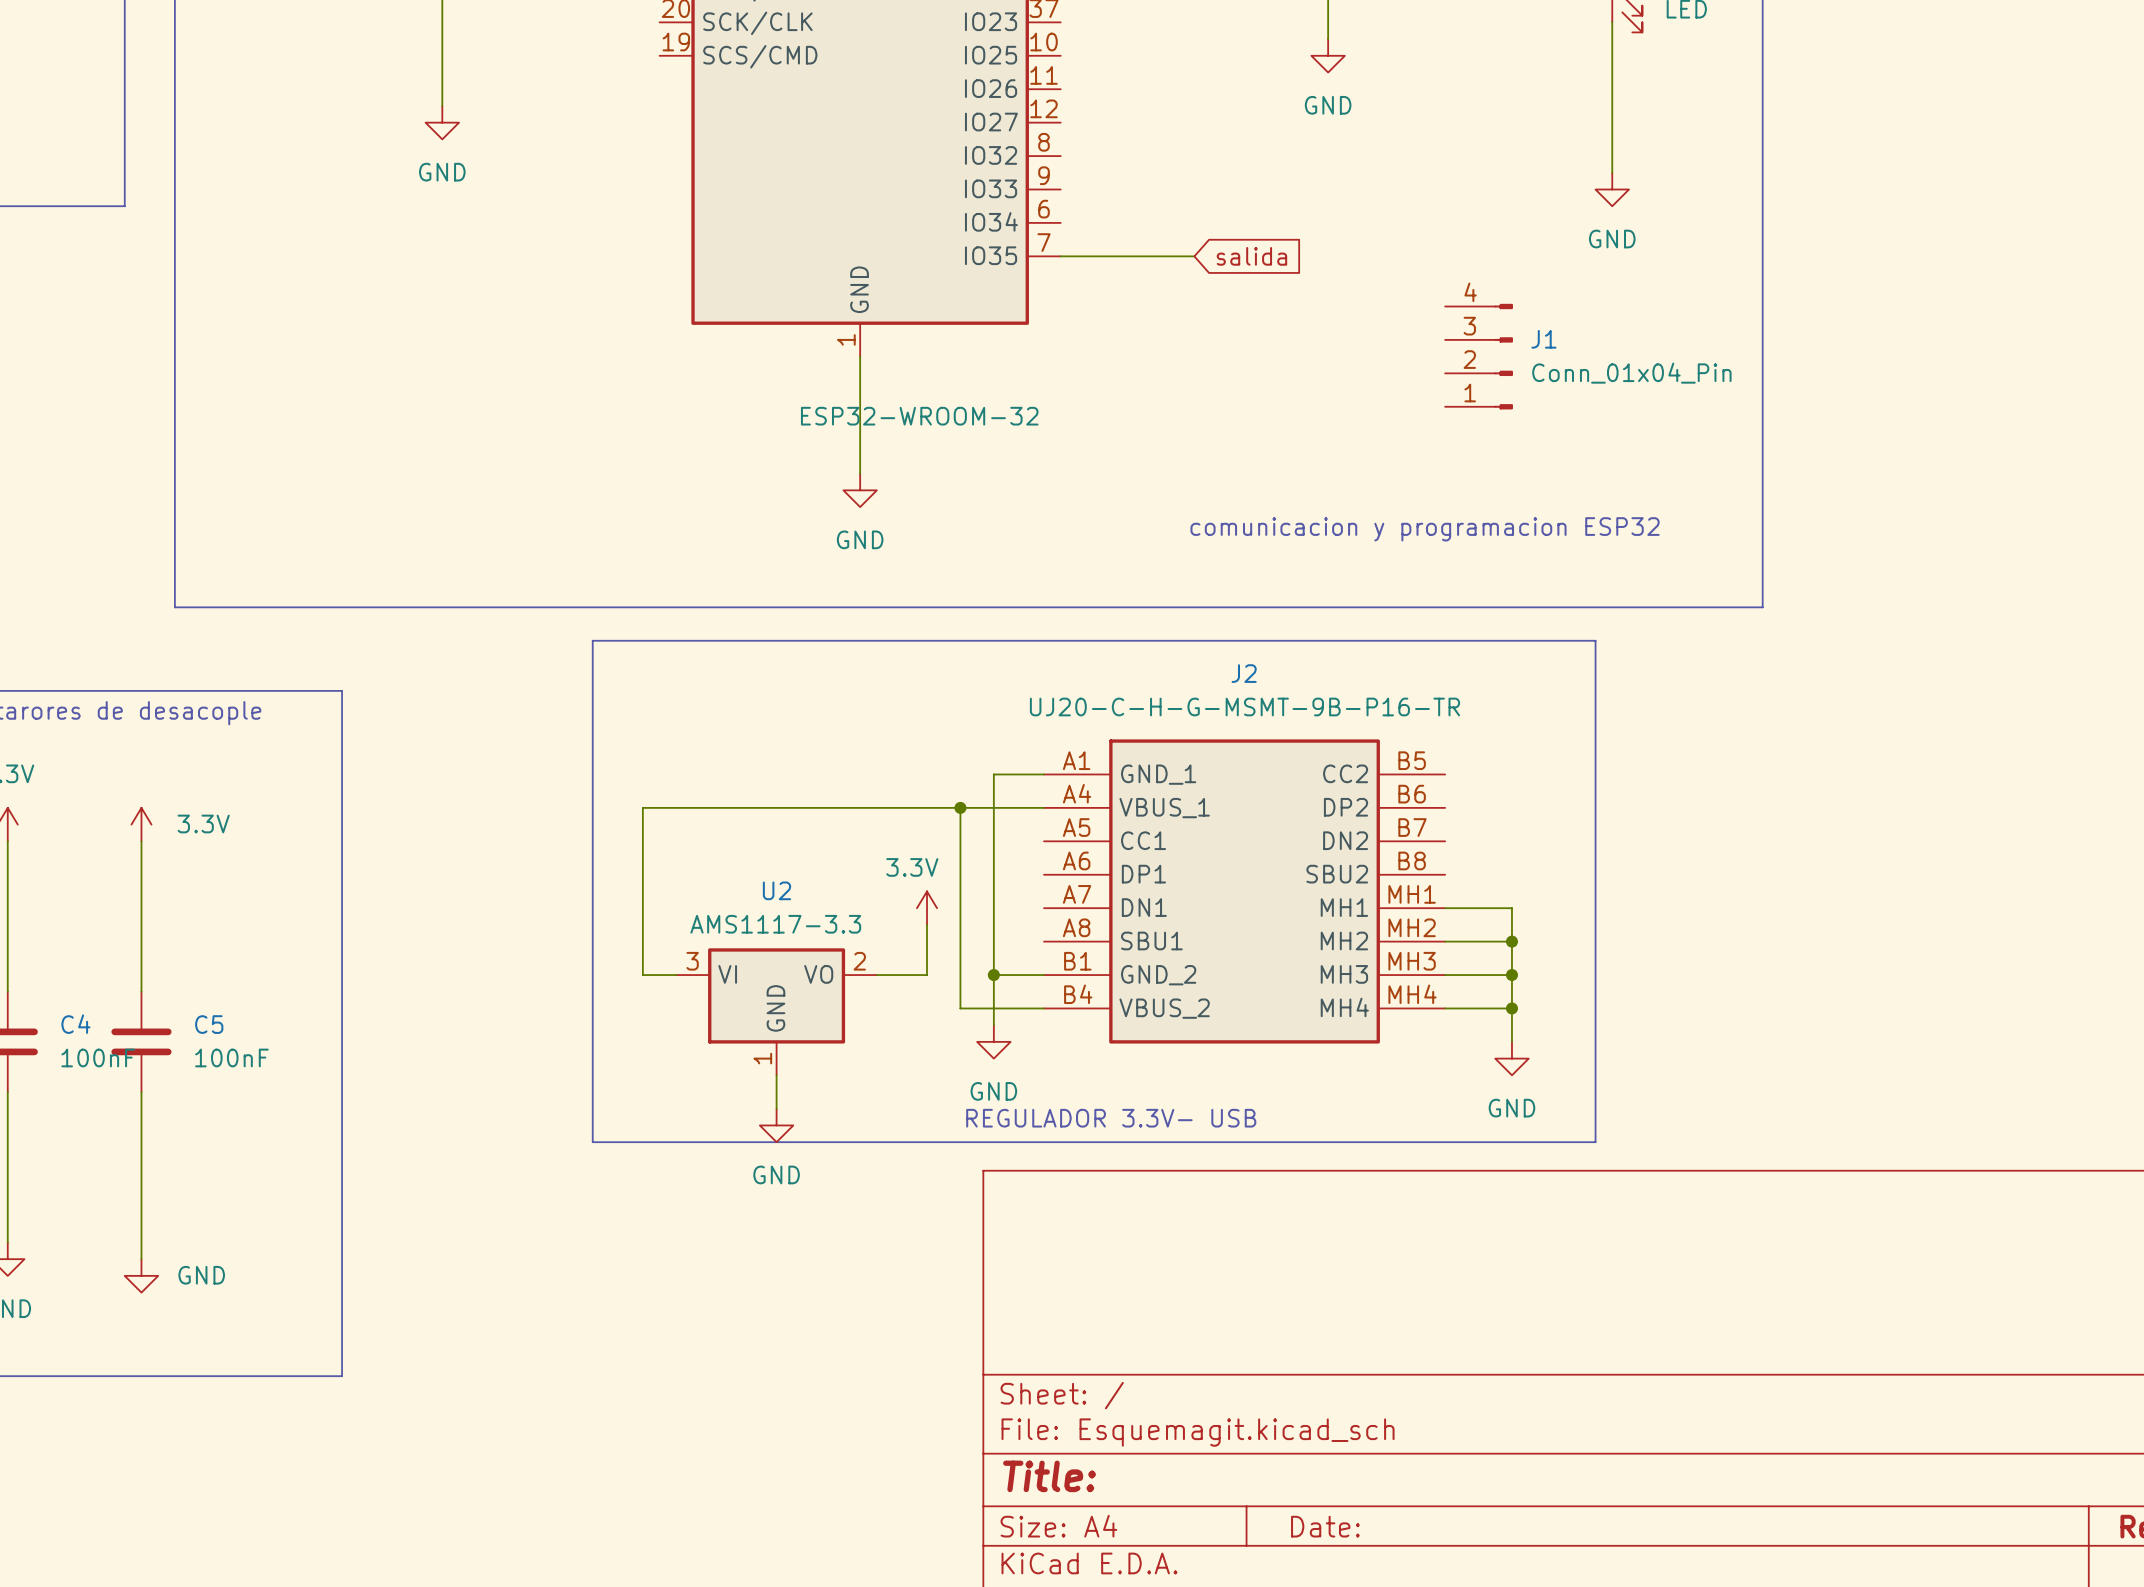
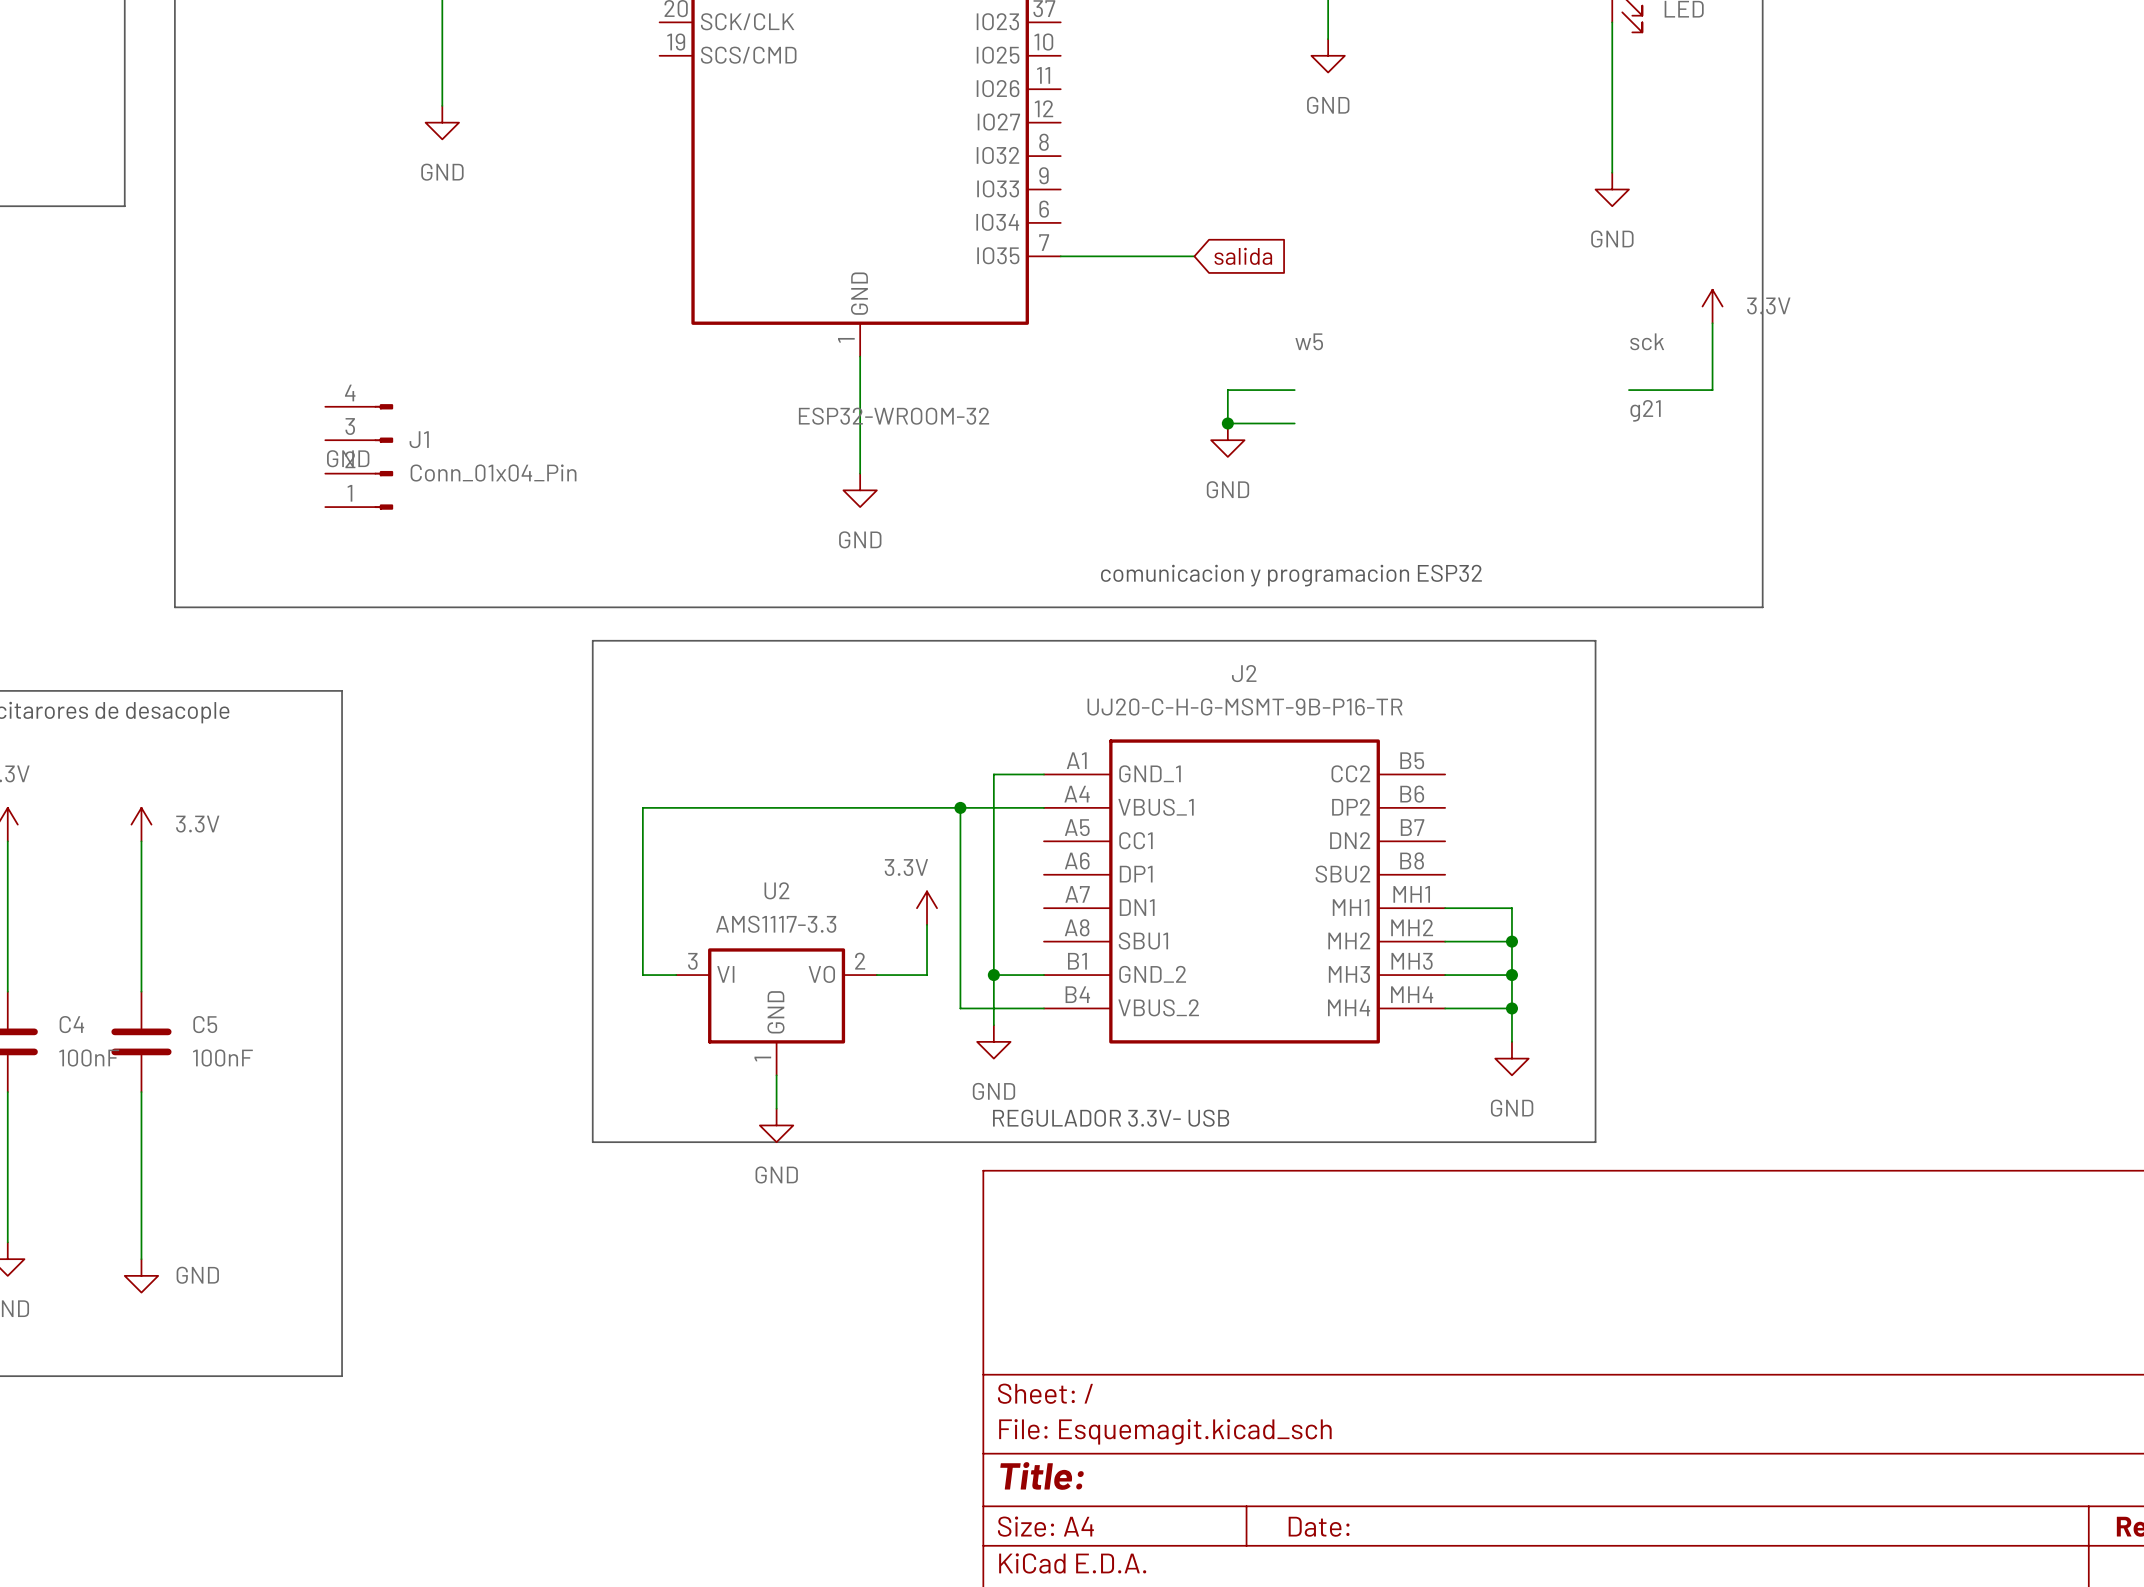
power symbol: none -> 3.3V (1712, 306)
wire: none -> (1712, 323) (1712, 390) (1628, 390)
label: none -> w5 (1309, 341)
label: none -> sck (1647, 341)
J1 position: (1479, 356) -> (359, 456)
wire: none -> (1294, 390) (1227, 390) (1227, 423) (1294, 423)
label: none -> g21 (1645, 410)
junction: none -> (1227, 423)
power symbol: none -> GND (1227, 440)
label: none -> GND (348, 458)
text position: comunicacion y programacion ESP32 (1425, 529) -> comunicacion y programacion ESP32 (1291, 575)

